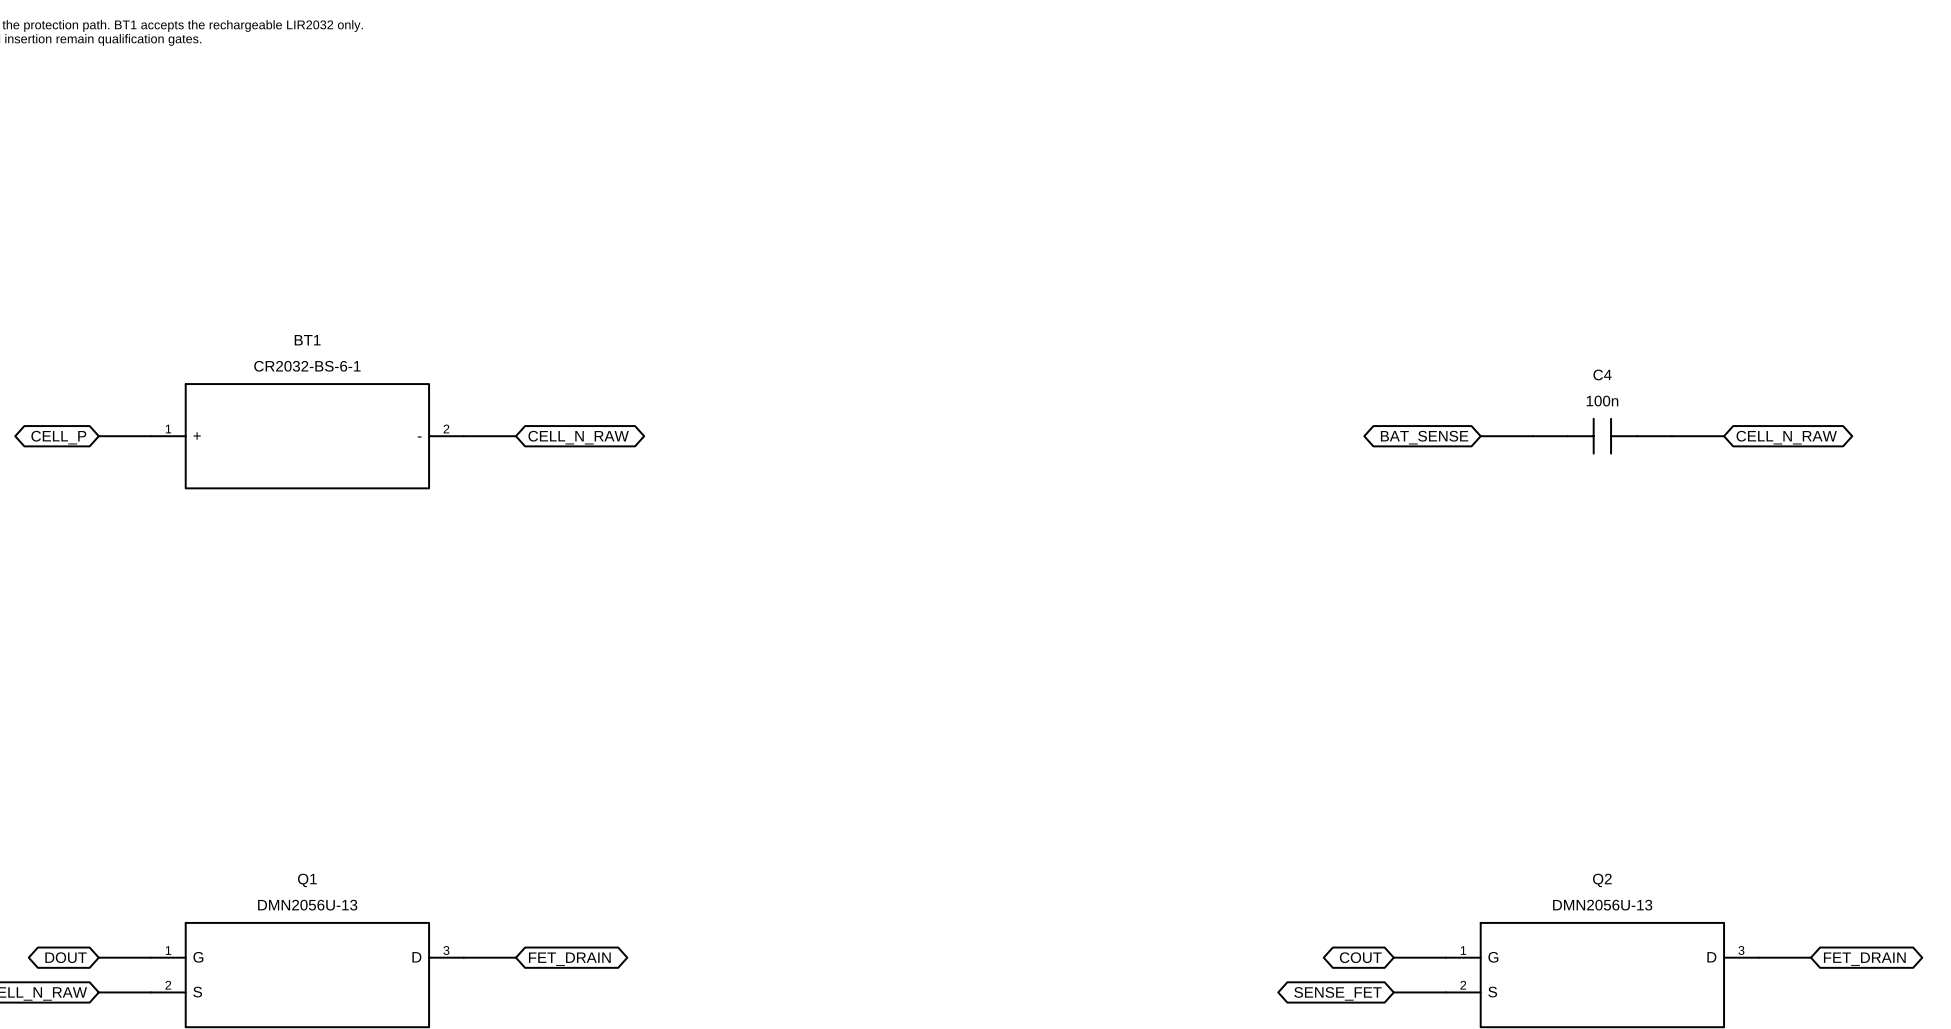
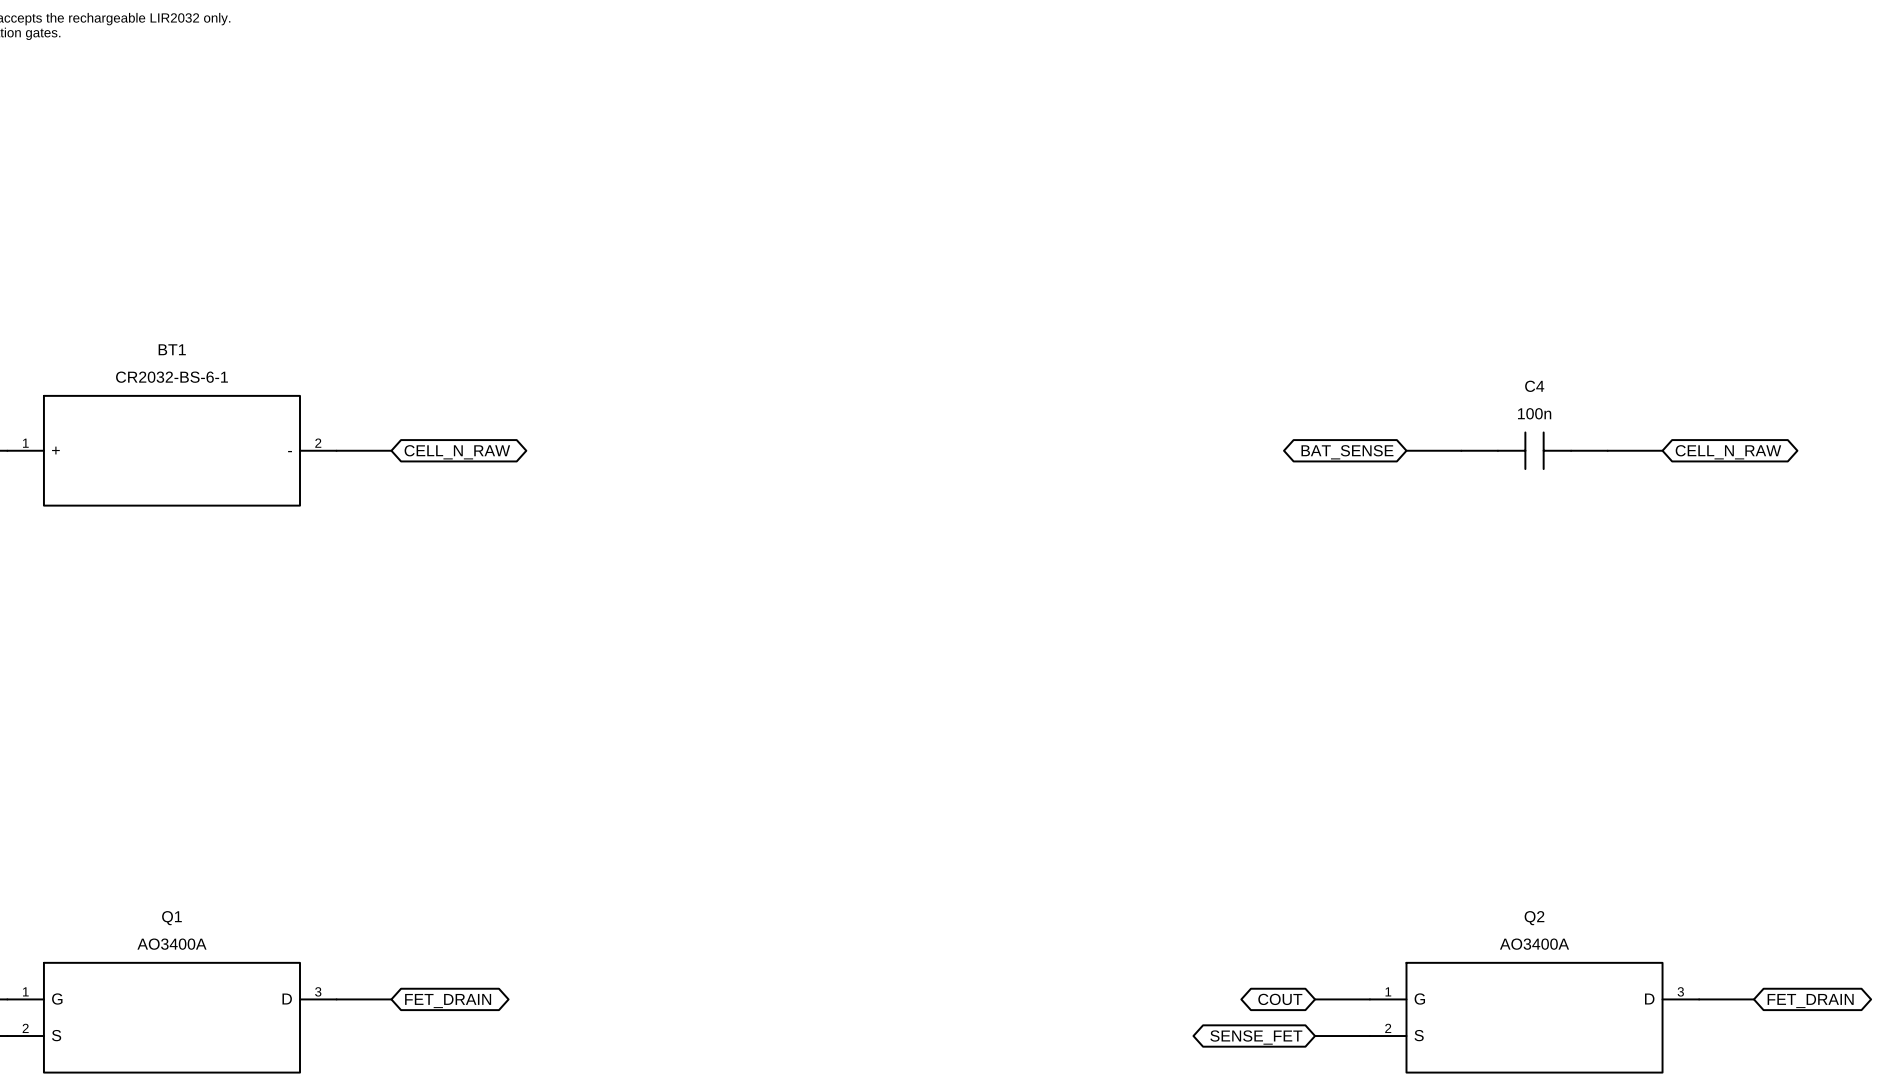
Q1 text: DMN2056U-13 (307, 905) -> AO3400A (171, 944)
Q2 text: DMN2056U-13 (1602, 905) -> AO3400A (1534, 944)

